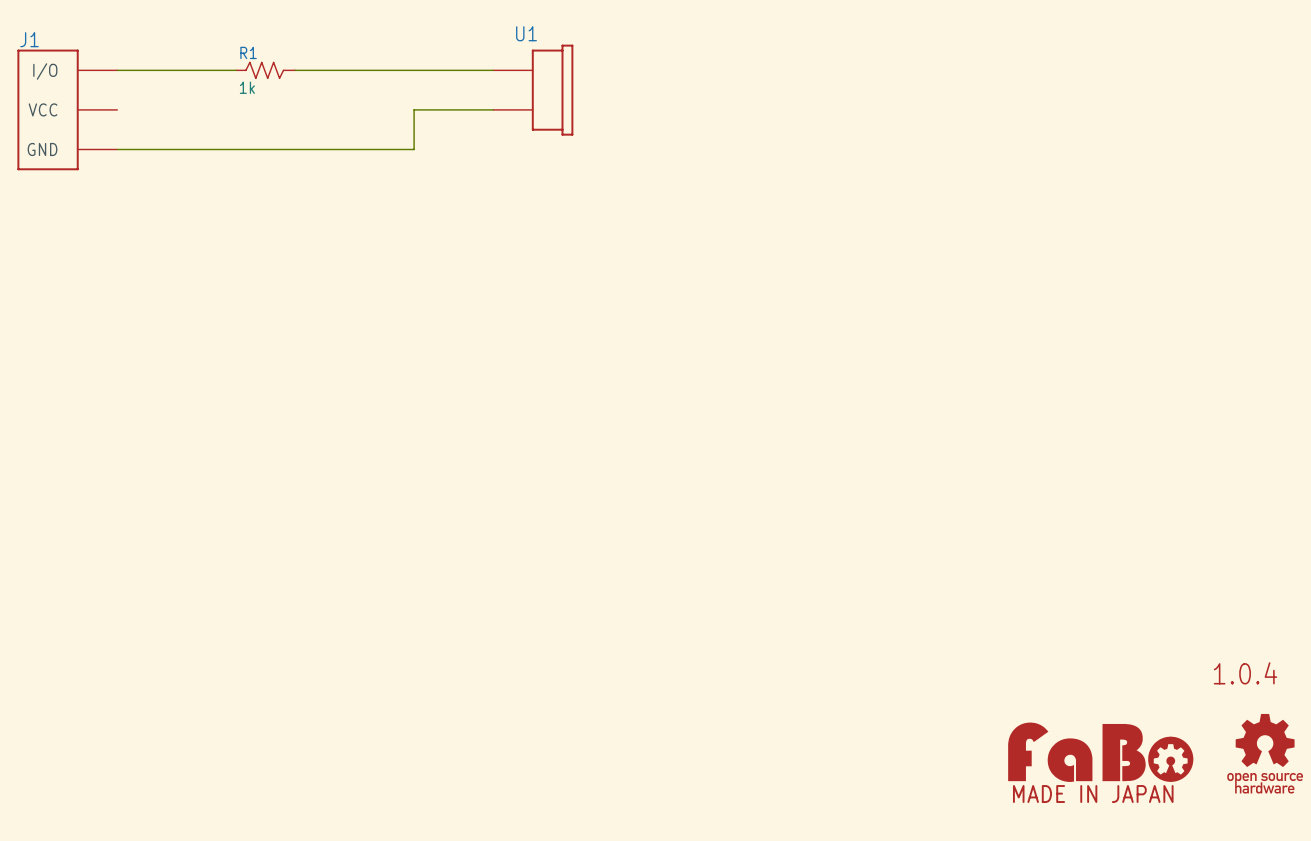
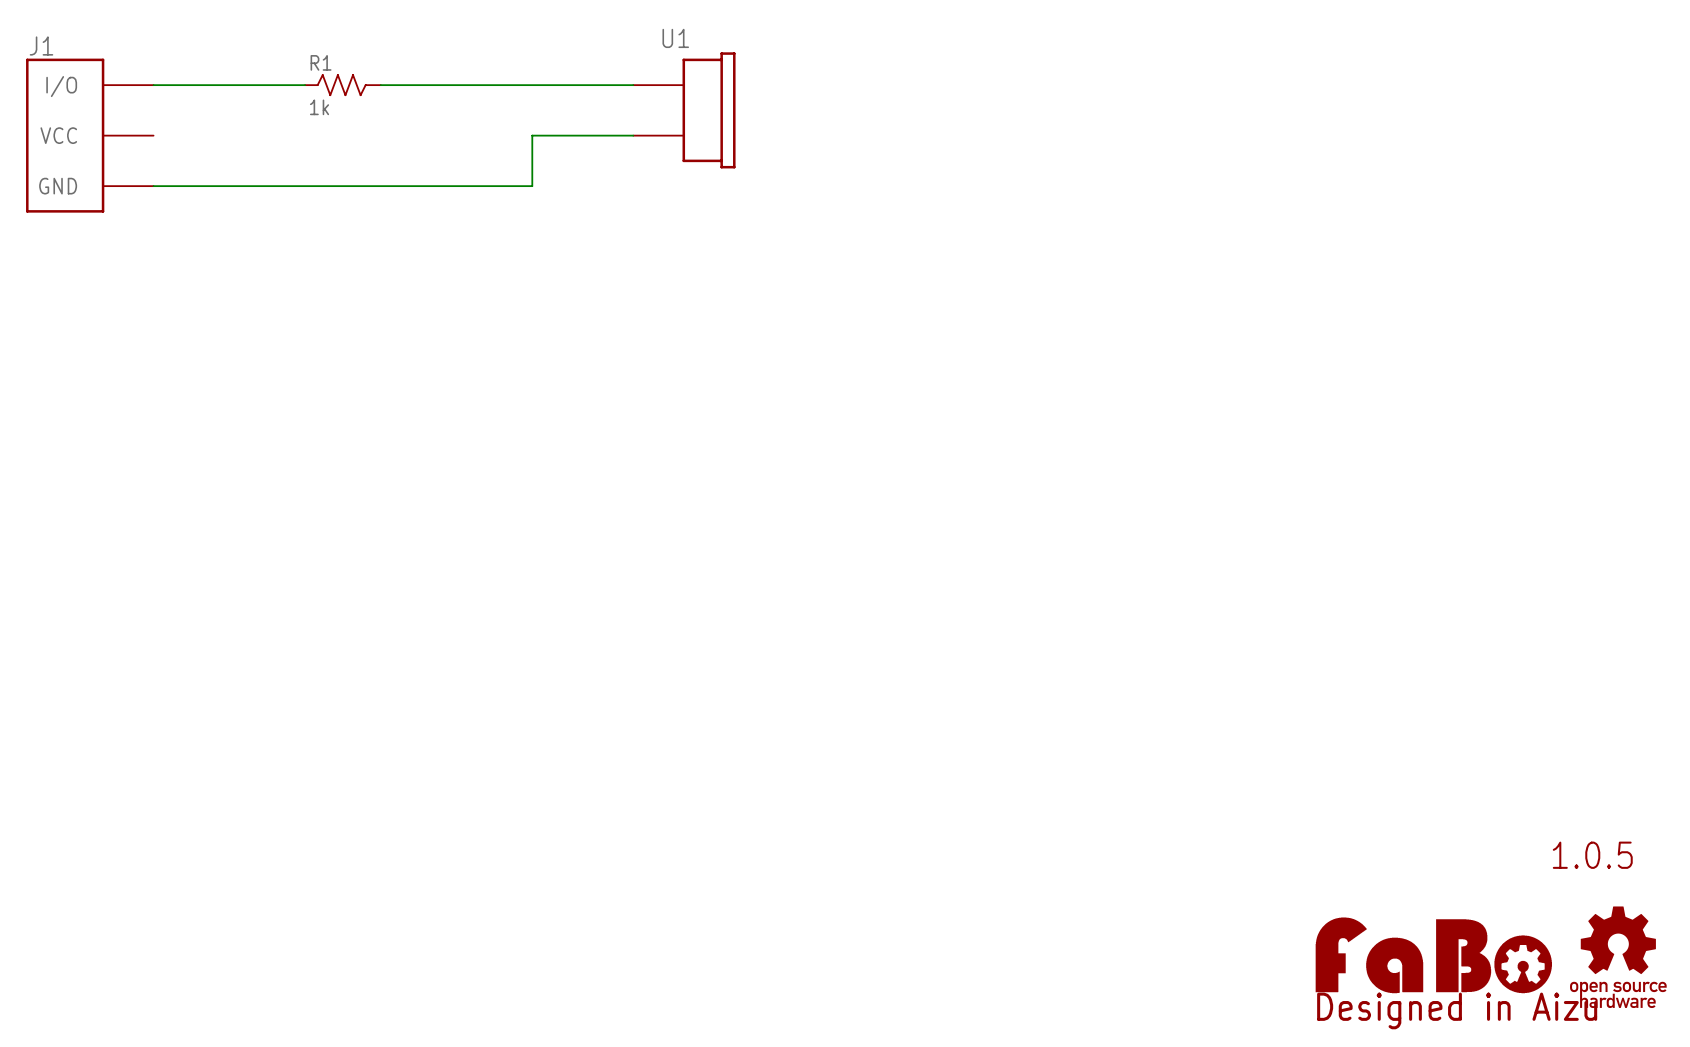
text: 1.0.4 (1245, 673) -> 1.0.5 (1592, 855)
part: (1100, 752) -> none
part: none -> (1433, 955)

